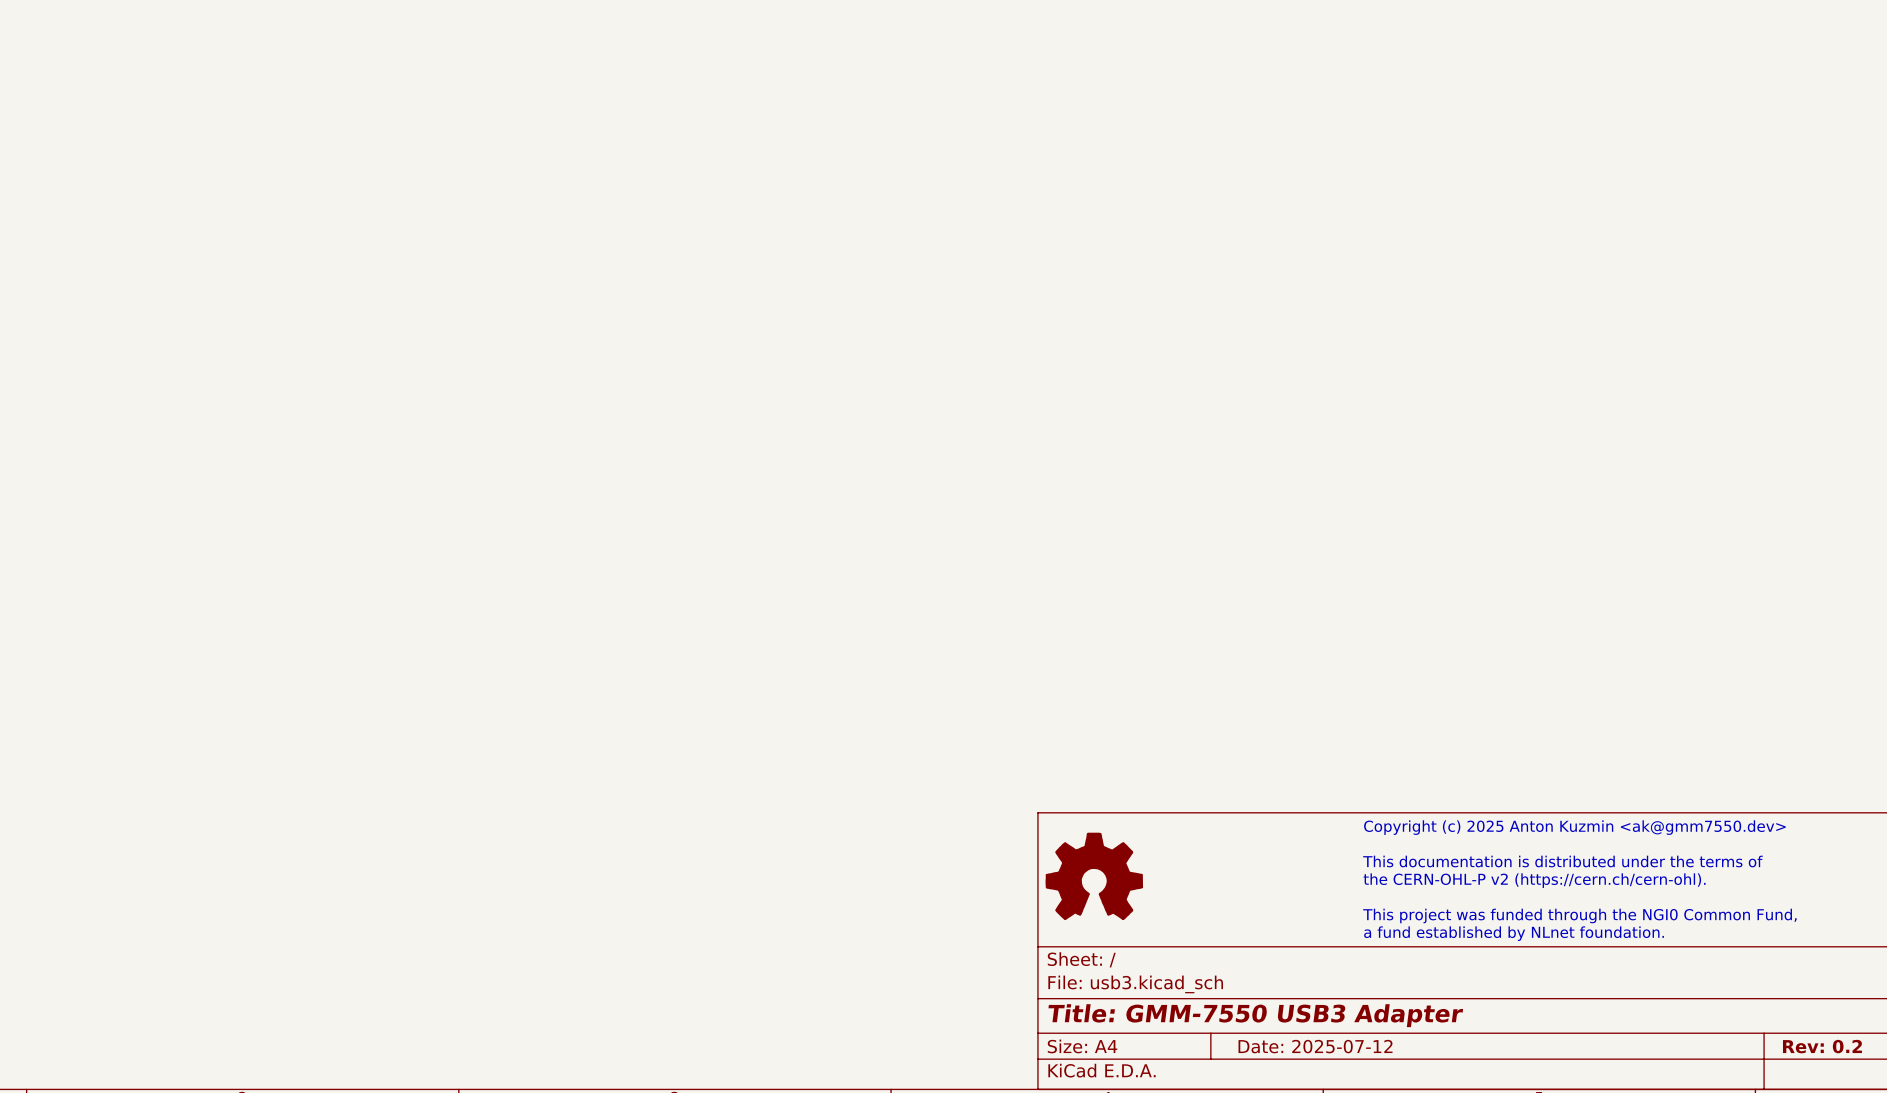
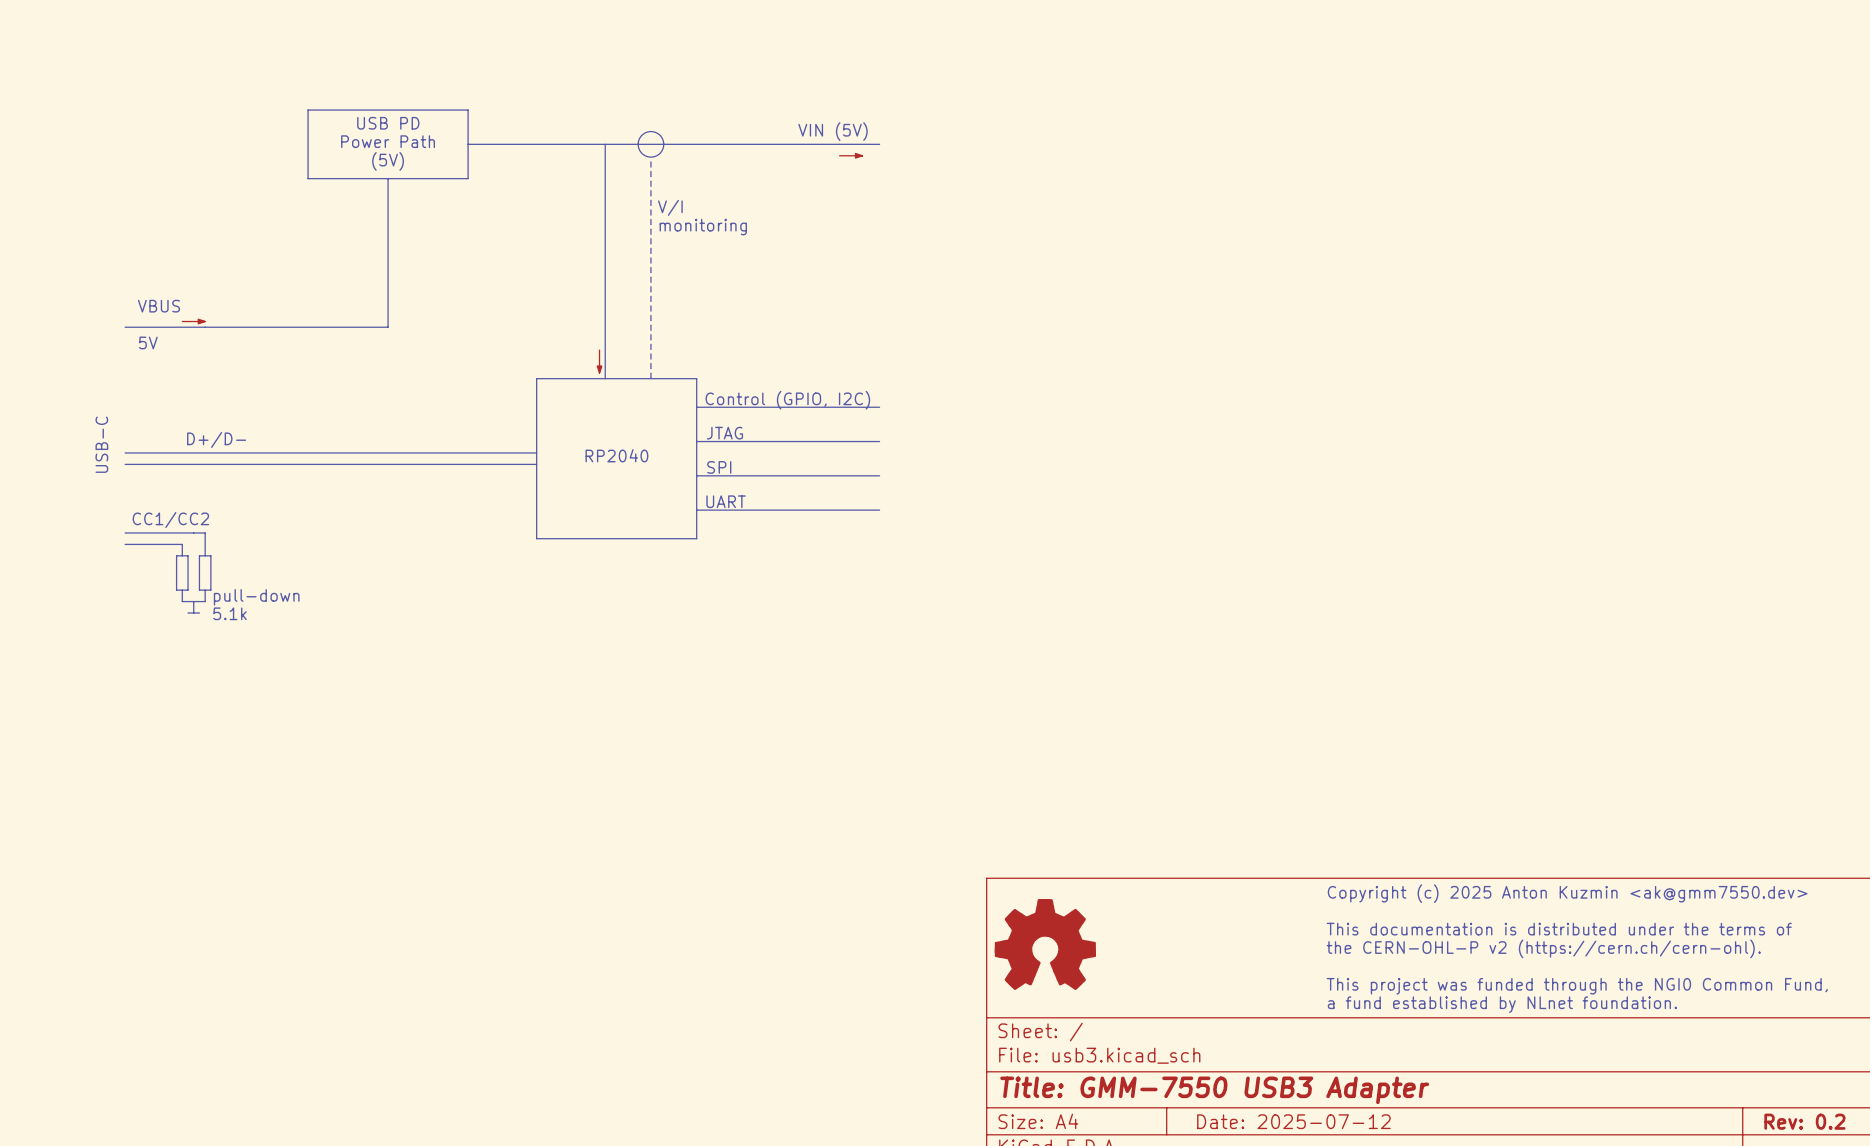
line: none -> (308, 110) (308, 178) (468, 178) (468, 110) (308, 110)
text: none -> USB PD (388, 123)
drawing: none -> [638, 131, 664, 158]
text: none -> VIN (5V) (833, 131)
text: none -> Power Path (388, 141)
line: none -> (468, 144) (879, 144)
line: none -> (605, 144) (605, 378)
power symbol: none -> (850, 155)
text: none -> (5V) (388, 161)
line: none -> (650, 161) (650, 378)
line: none -> (388, 178) (388, 327) (125, 327)
text: none -> V/I (670, 207)
text: none -> monitoring (703, 227)
text: none -> VBUS (158, 306)
power symbol: none -> (193, 321)
text: none -> 5V (148, 342)
power symbol: none -> (599, 361)
line: none -> (536, 378) (696, 378) (696, 538) (536, 538) (536, 378)
text: none -> Control (GPIO, I2C) (787, 400)
line: none -> (696, 407) (879, 407)
text: none -> JTAG (724, 433)
text: none -> D+/D- (216, 439)
line: none -> (696, 441) (879, 441)
text: none -> USB-C (101, 444)
line: none -> (125, 452) (536, 452)
text: none -> RP2040 (616, 455)
line: none -> (125, 464) (536, 464)
text: none -> SPI (719, 467)
line: none -> (696, 475) (879, 475)
text: none -> UART (726, 501)
line: none -> (696, 510) (879, 510)
text: none -> CC1/CC2 (170, 519)
line: none -> (125, 532) (205, 532) (205, 555)
line: none -> (125, 544) (182, 544) (182, 555)
line: none -> (176, 555) (188, 555) (188, 590) (176, 590) (176, 555)
line: none -> (199, 555) (210, 555) (210, 590) (199, 590) (199, 555)
line: none -> (182, 590) (182, 601) (205, 601) (205, 590)
text: none -> pull-down (256, 597)
line: none -> (193, 601) (193, 612)
line: none -> (188, 612) (199, 612)
text: none -> 5.1k (230, 613)

